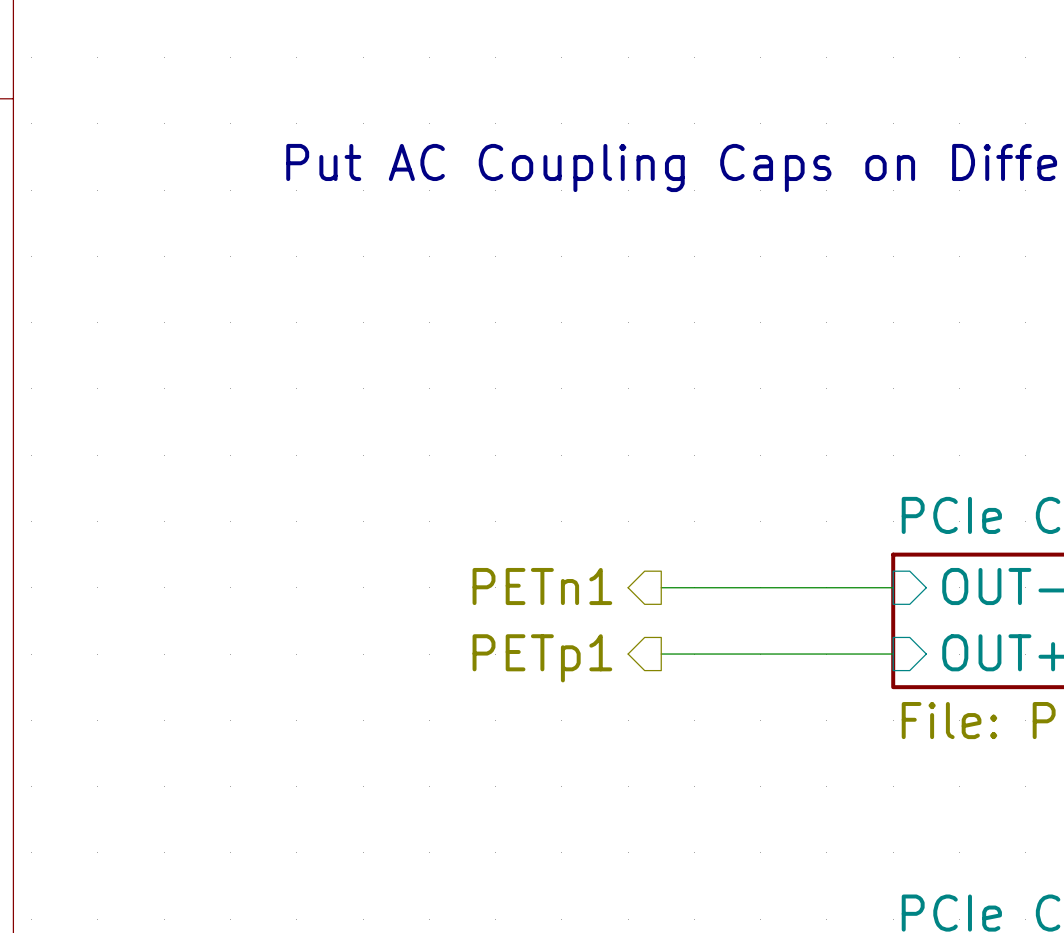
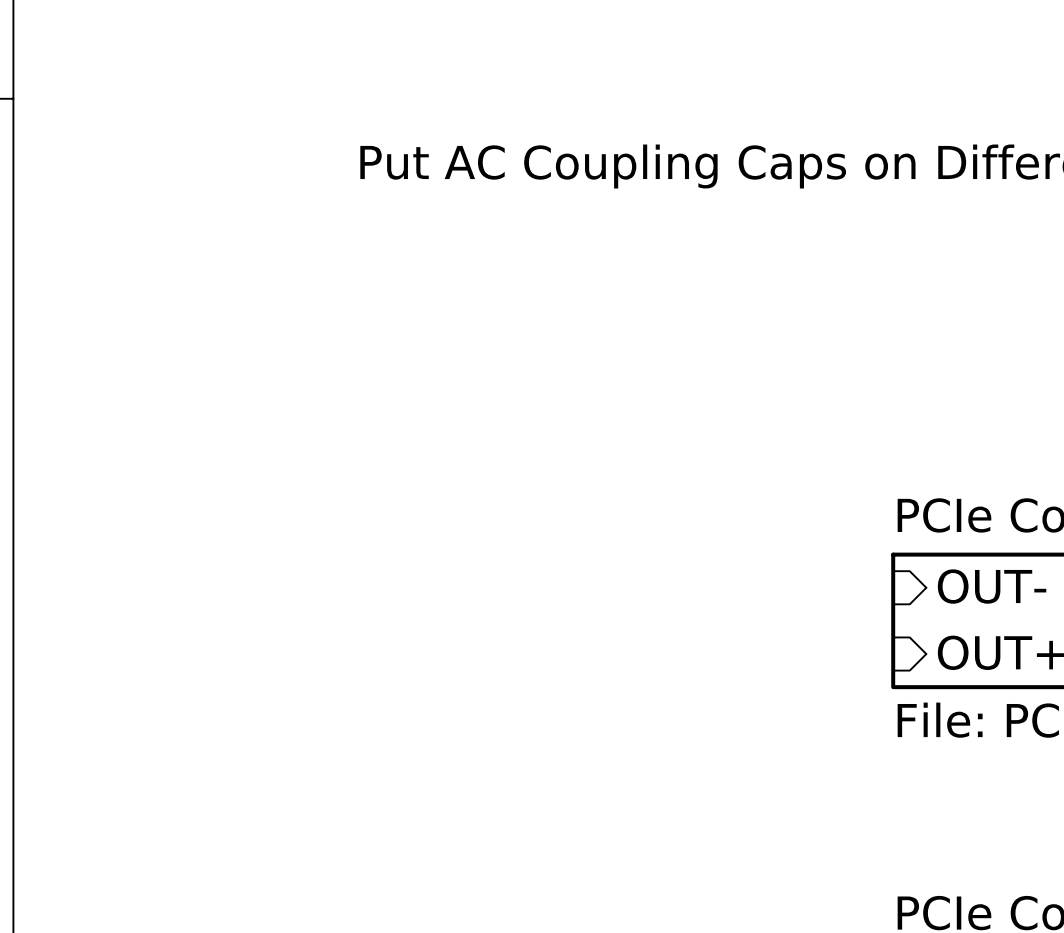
hierarchical label: PETn1 (542, 586) -> none
wire: (661, 587) (893, 587) -> none
wire: (661, 654) (893, 654) -> none
hierarchical label: PETp1 (542, 658) -> none

